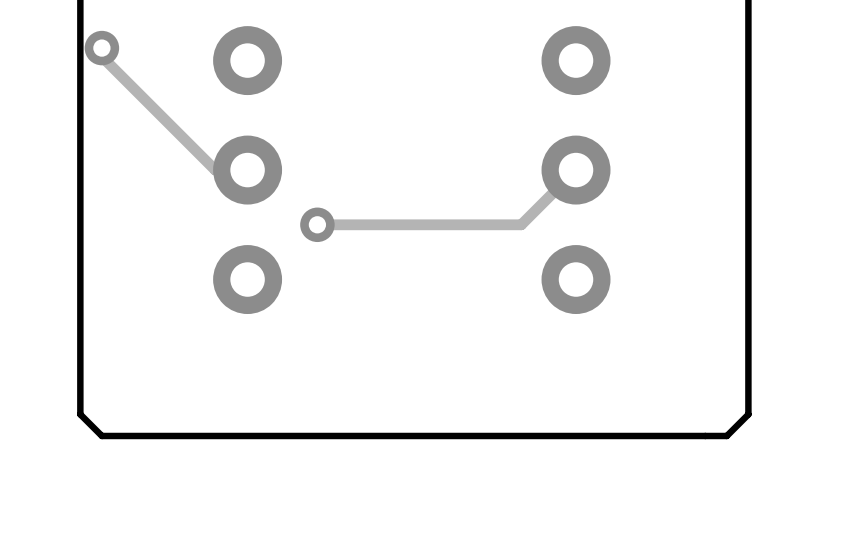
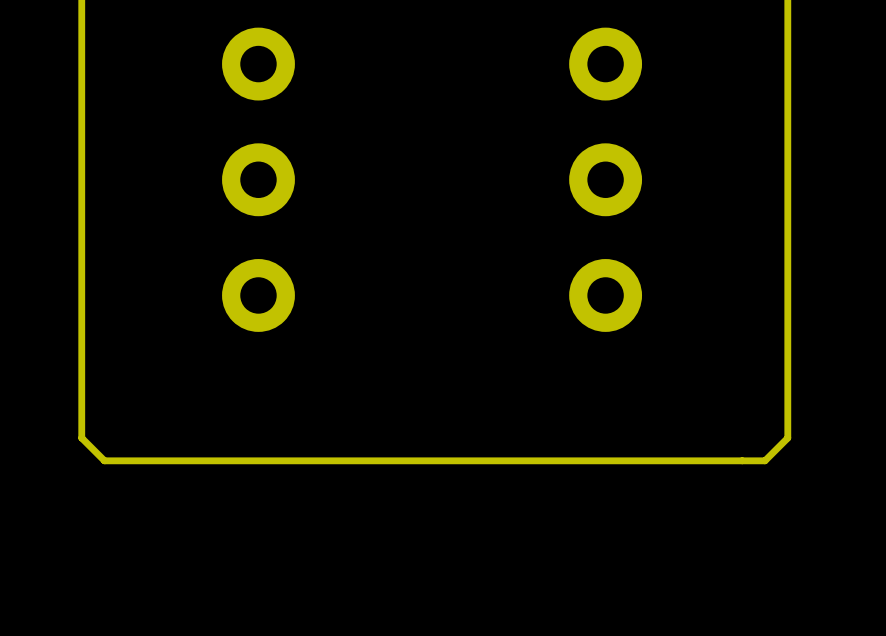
track: (93, 48) (215, 170) (247, 170) -> none
via: (101, 48) -> none
track: (576, 170) (521, 224) (317, 224) -> none
via: (317, 224) -> none

